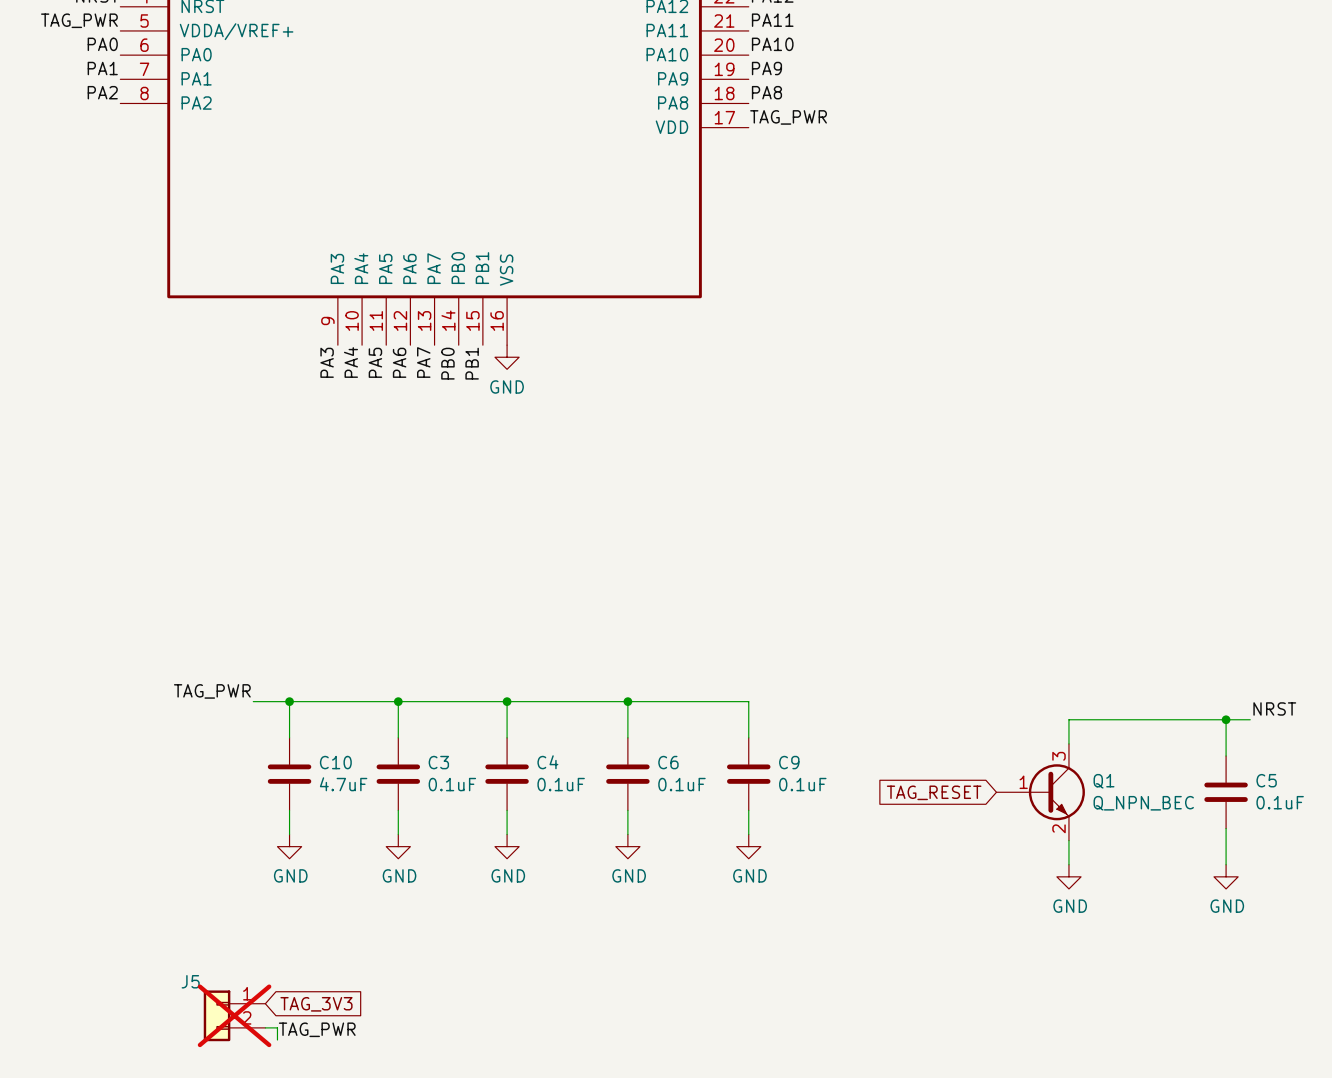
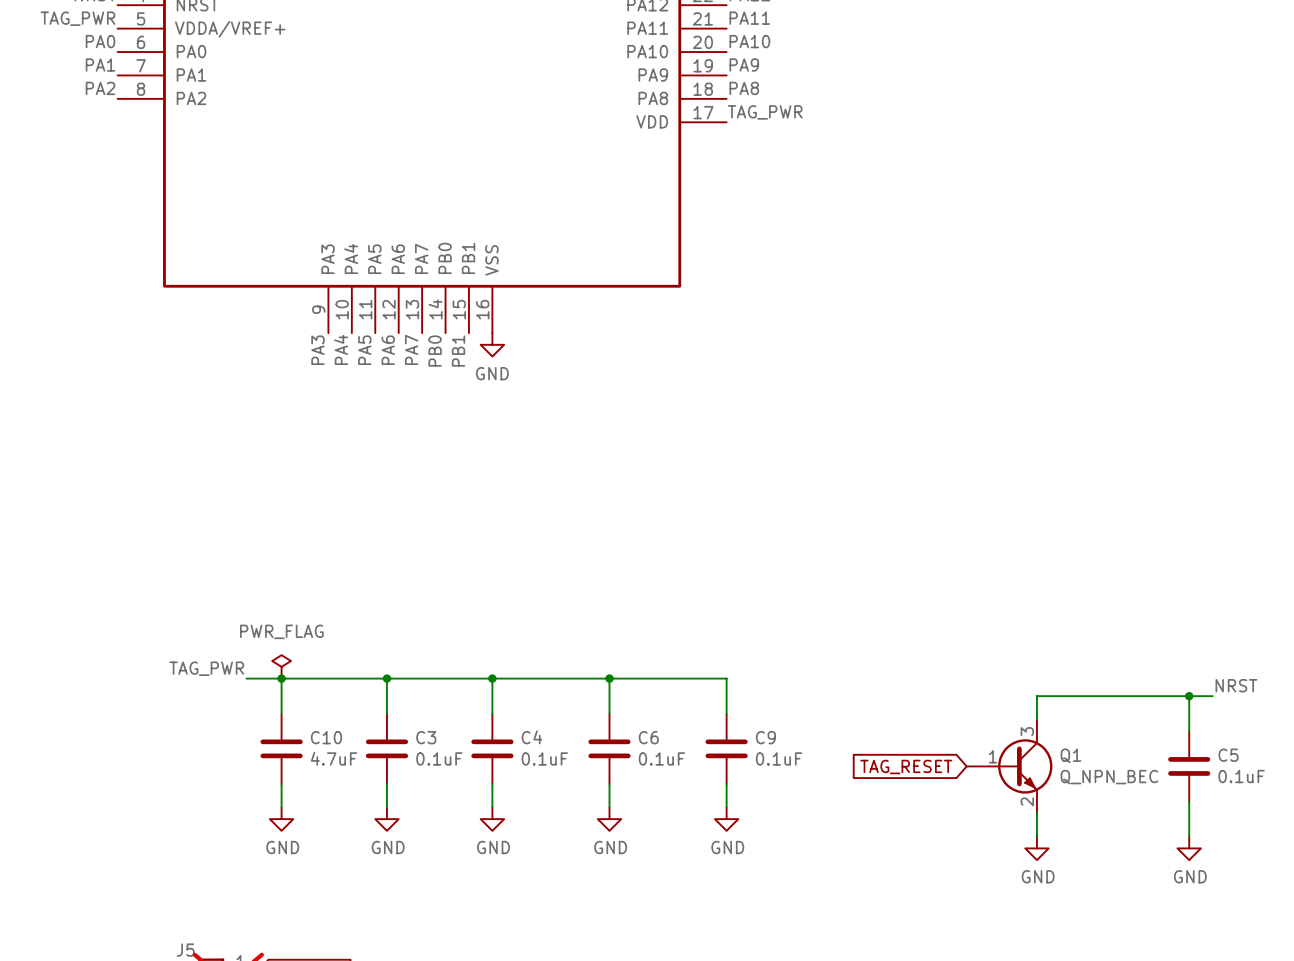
power symbol: none -> PWR_FLAG (281, 666)

